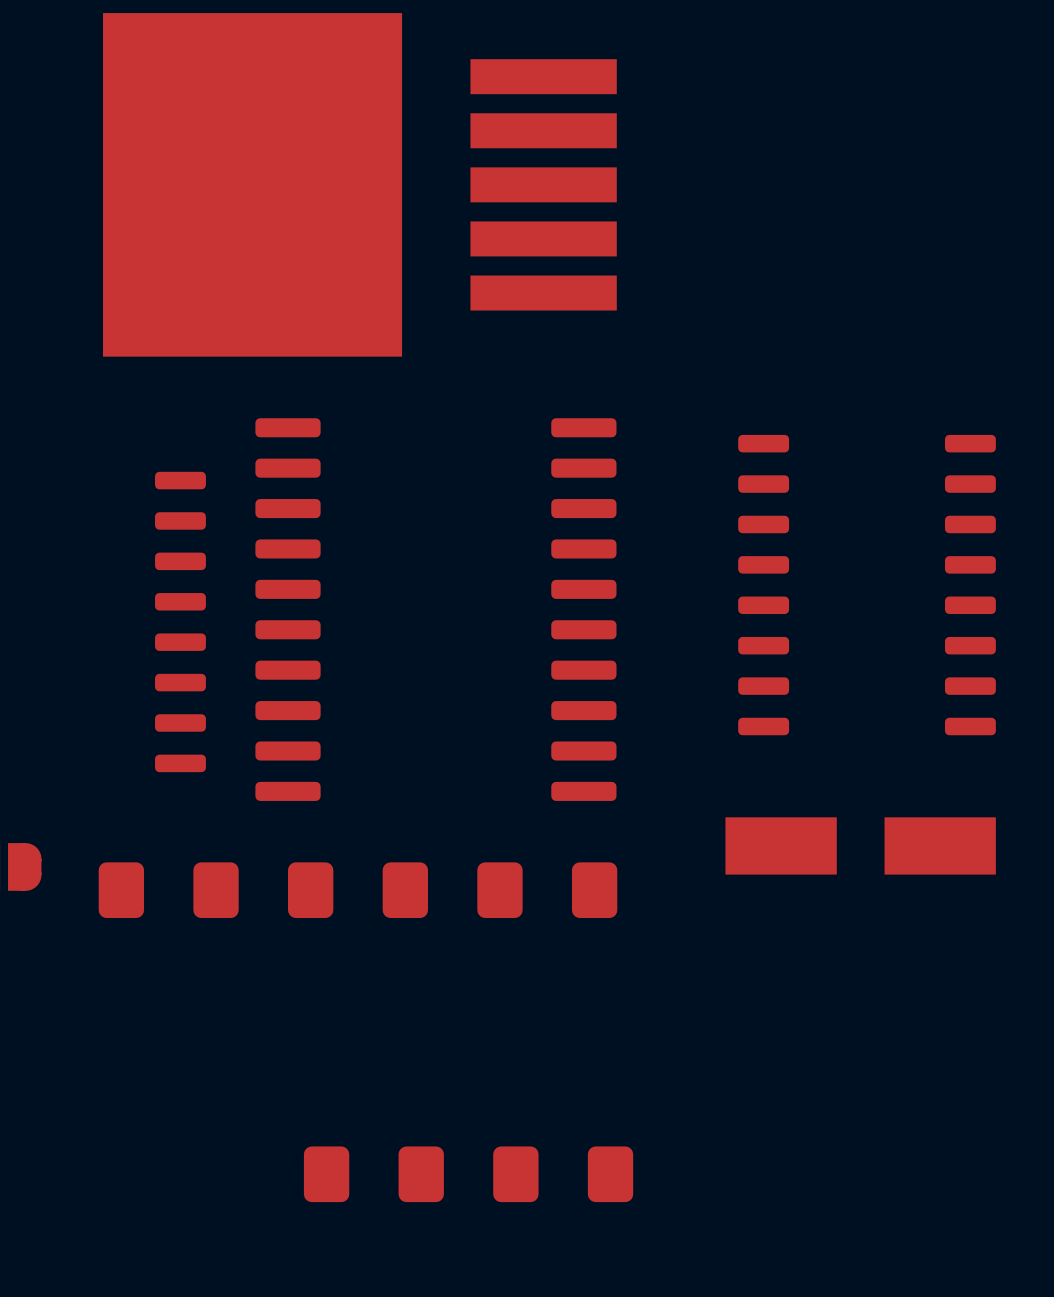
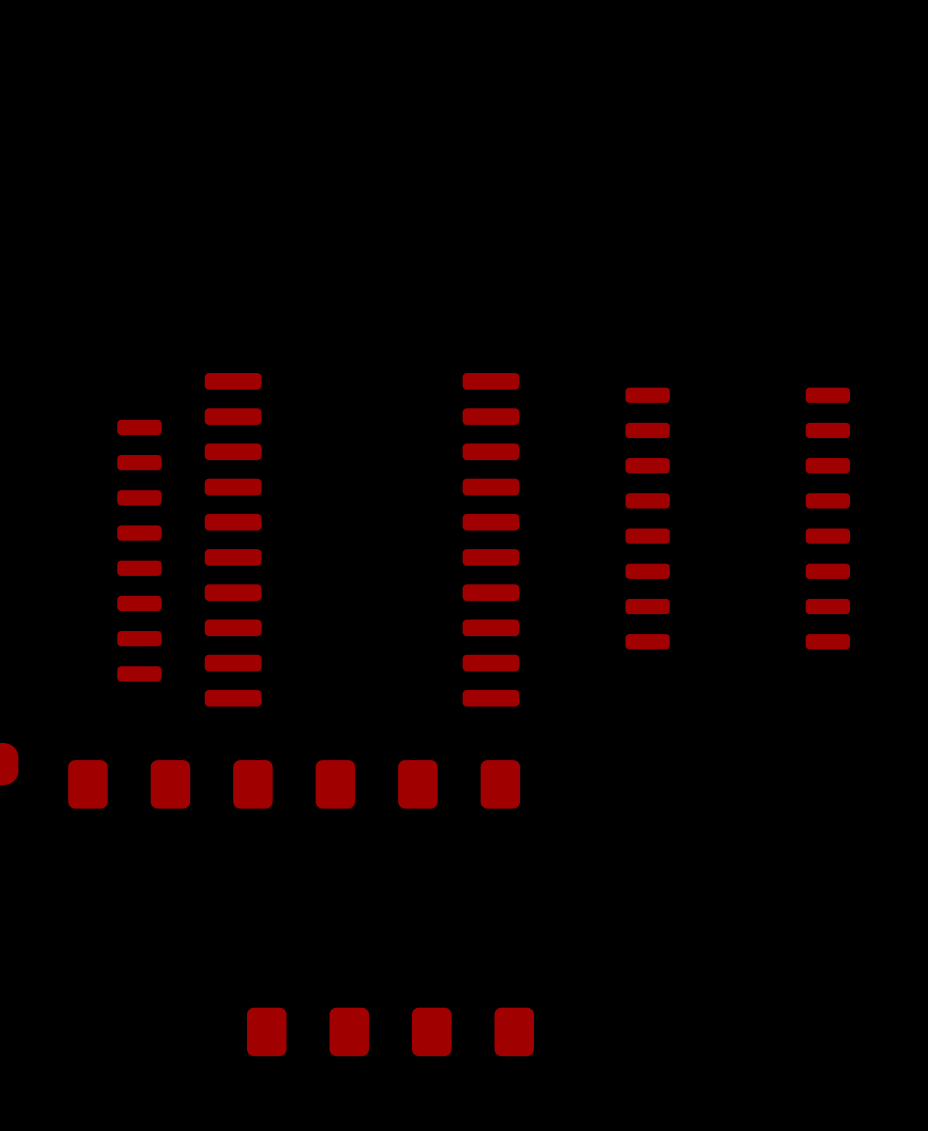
part: (359, 184) -> none
part: (860, 845) -> none

